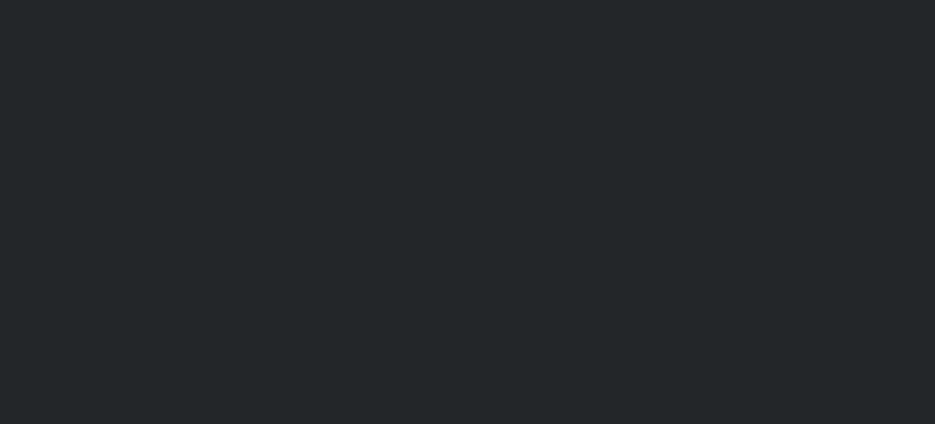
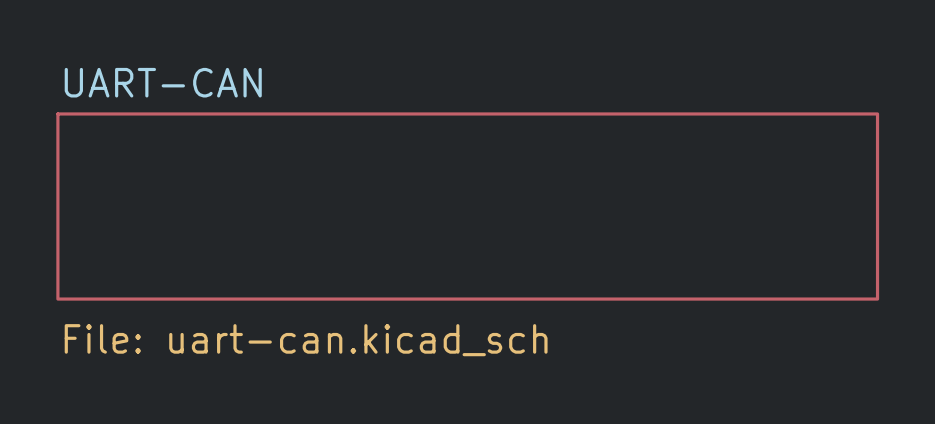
sheet UART-CAN: none -> File: uart-can.kicad_sch (467, 206)

